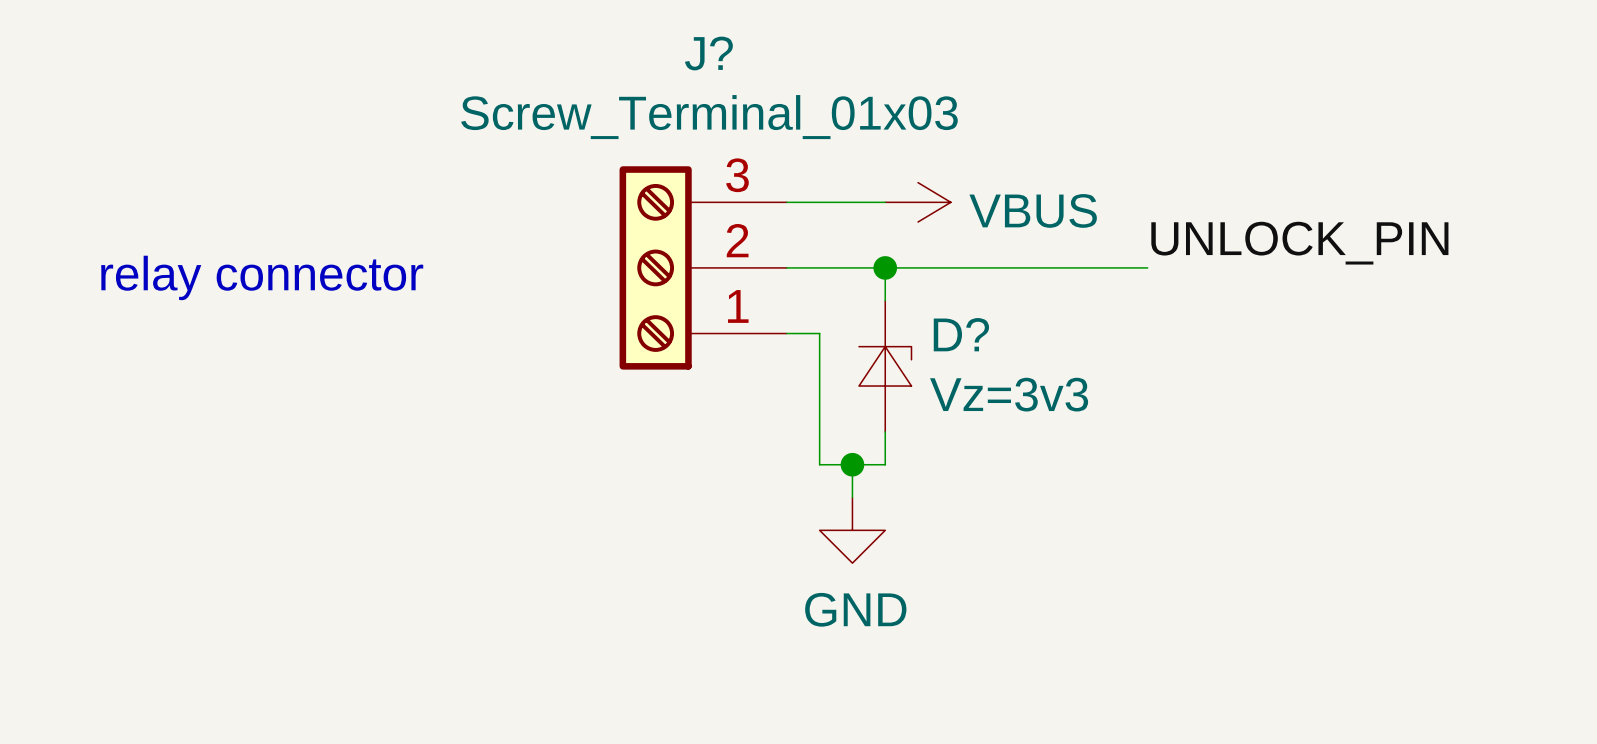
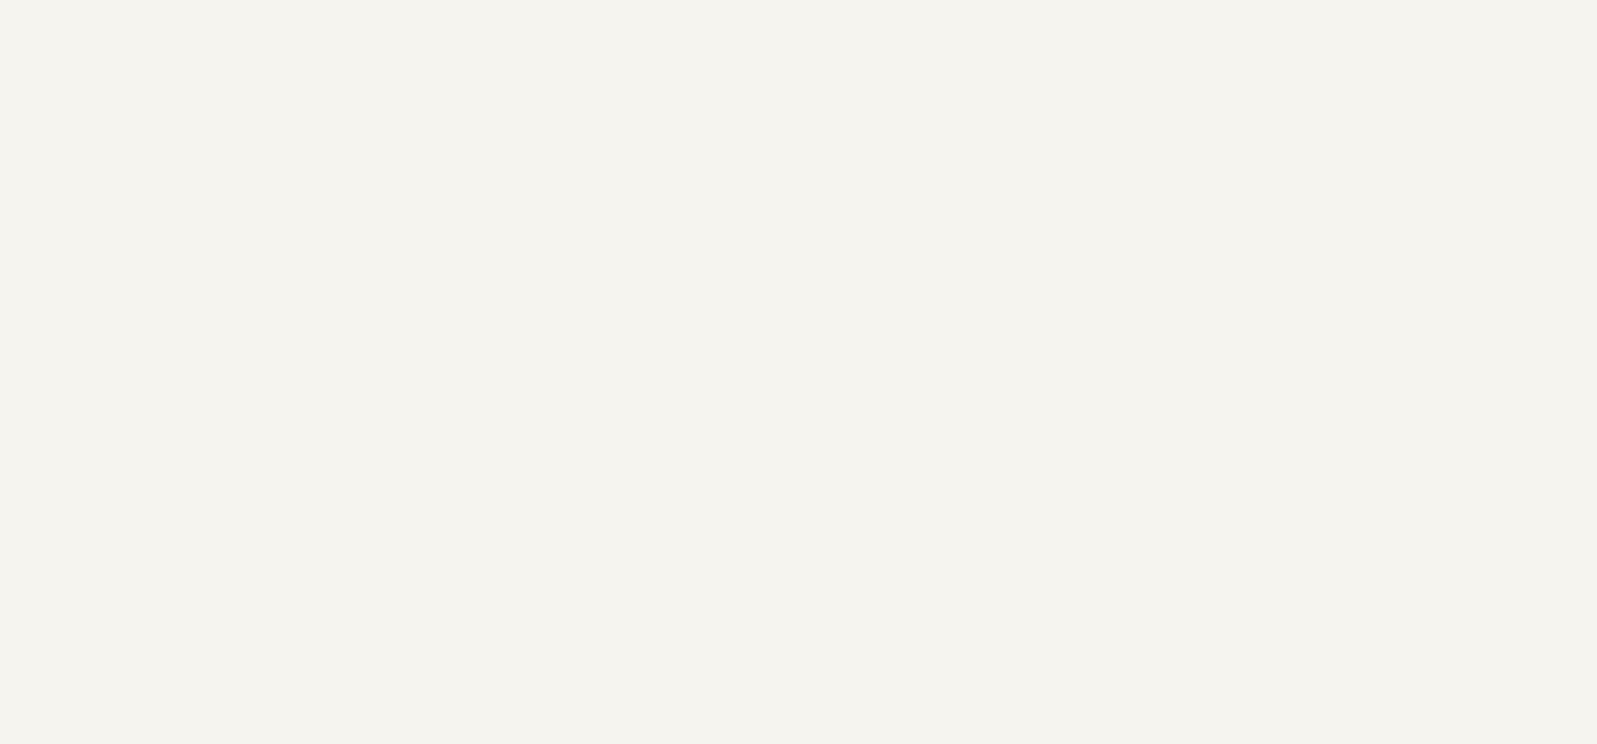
wire: (786, 202) (885, 202) -> none
power symbol: VBUS (918, 202) -> none
label: UNLOCK_PIN (1299, 243) -> none
J?: Screw_Terminal_01x03 (703, 267) -> none
wire: (786, 267) (1147, 267) -> none
wire: (885, 267) (885, 300) -> none
junction: (885, 267) -> none
text: relay connector (262, 277) -> none
wire: (786, 333) (819, 333) (819, 464) (885, 464) (885, 431) -> none
D?: Vz=3v3 (885, 366) -> none
wire: (852, 464) (852, 497) -> none
junction: (852, 464) -> none
power symbol: GND (852, 530) -> none

